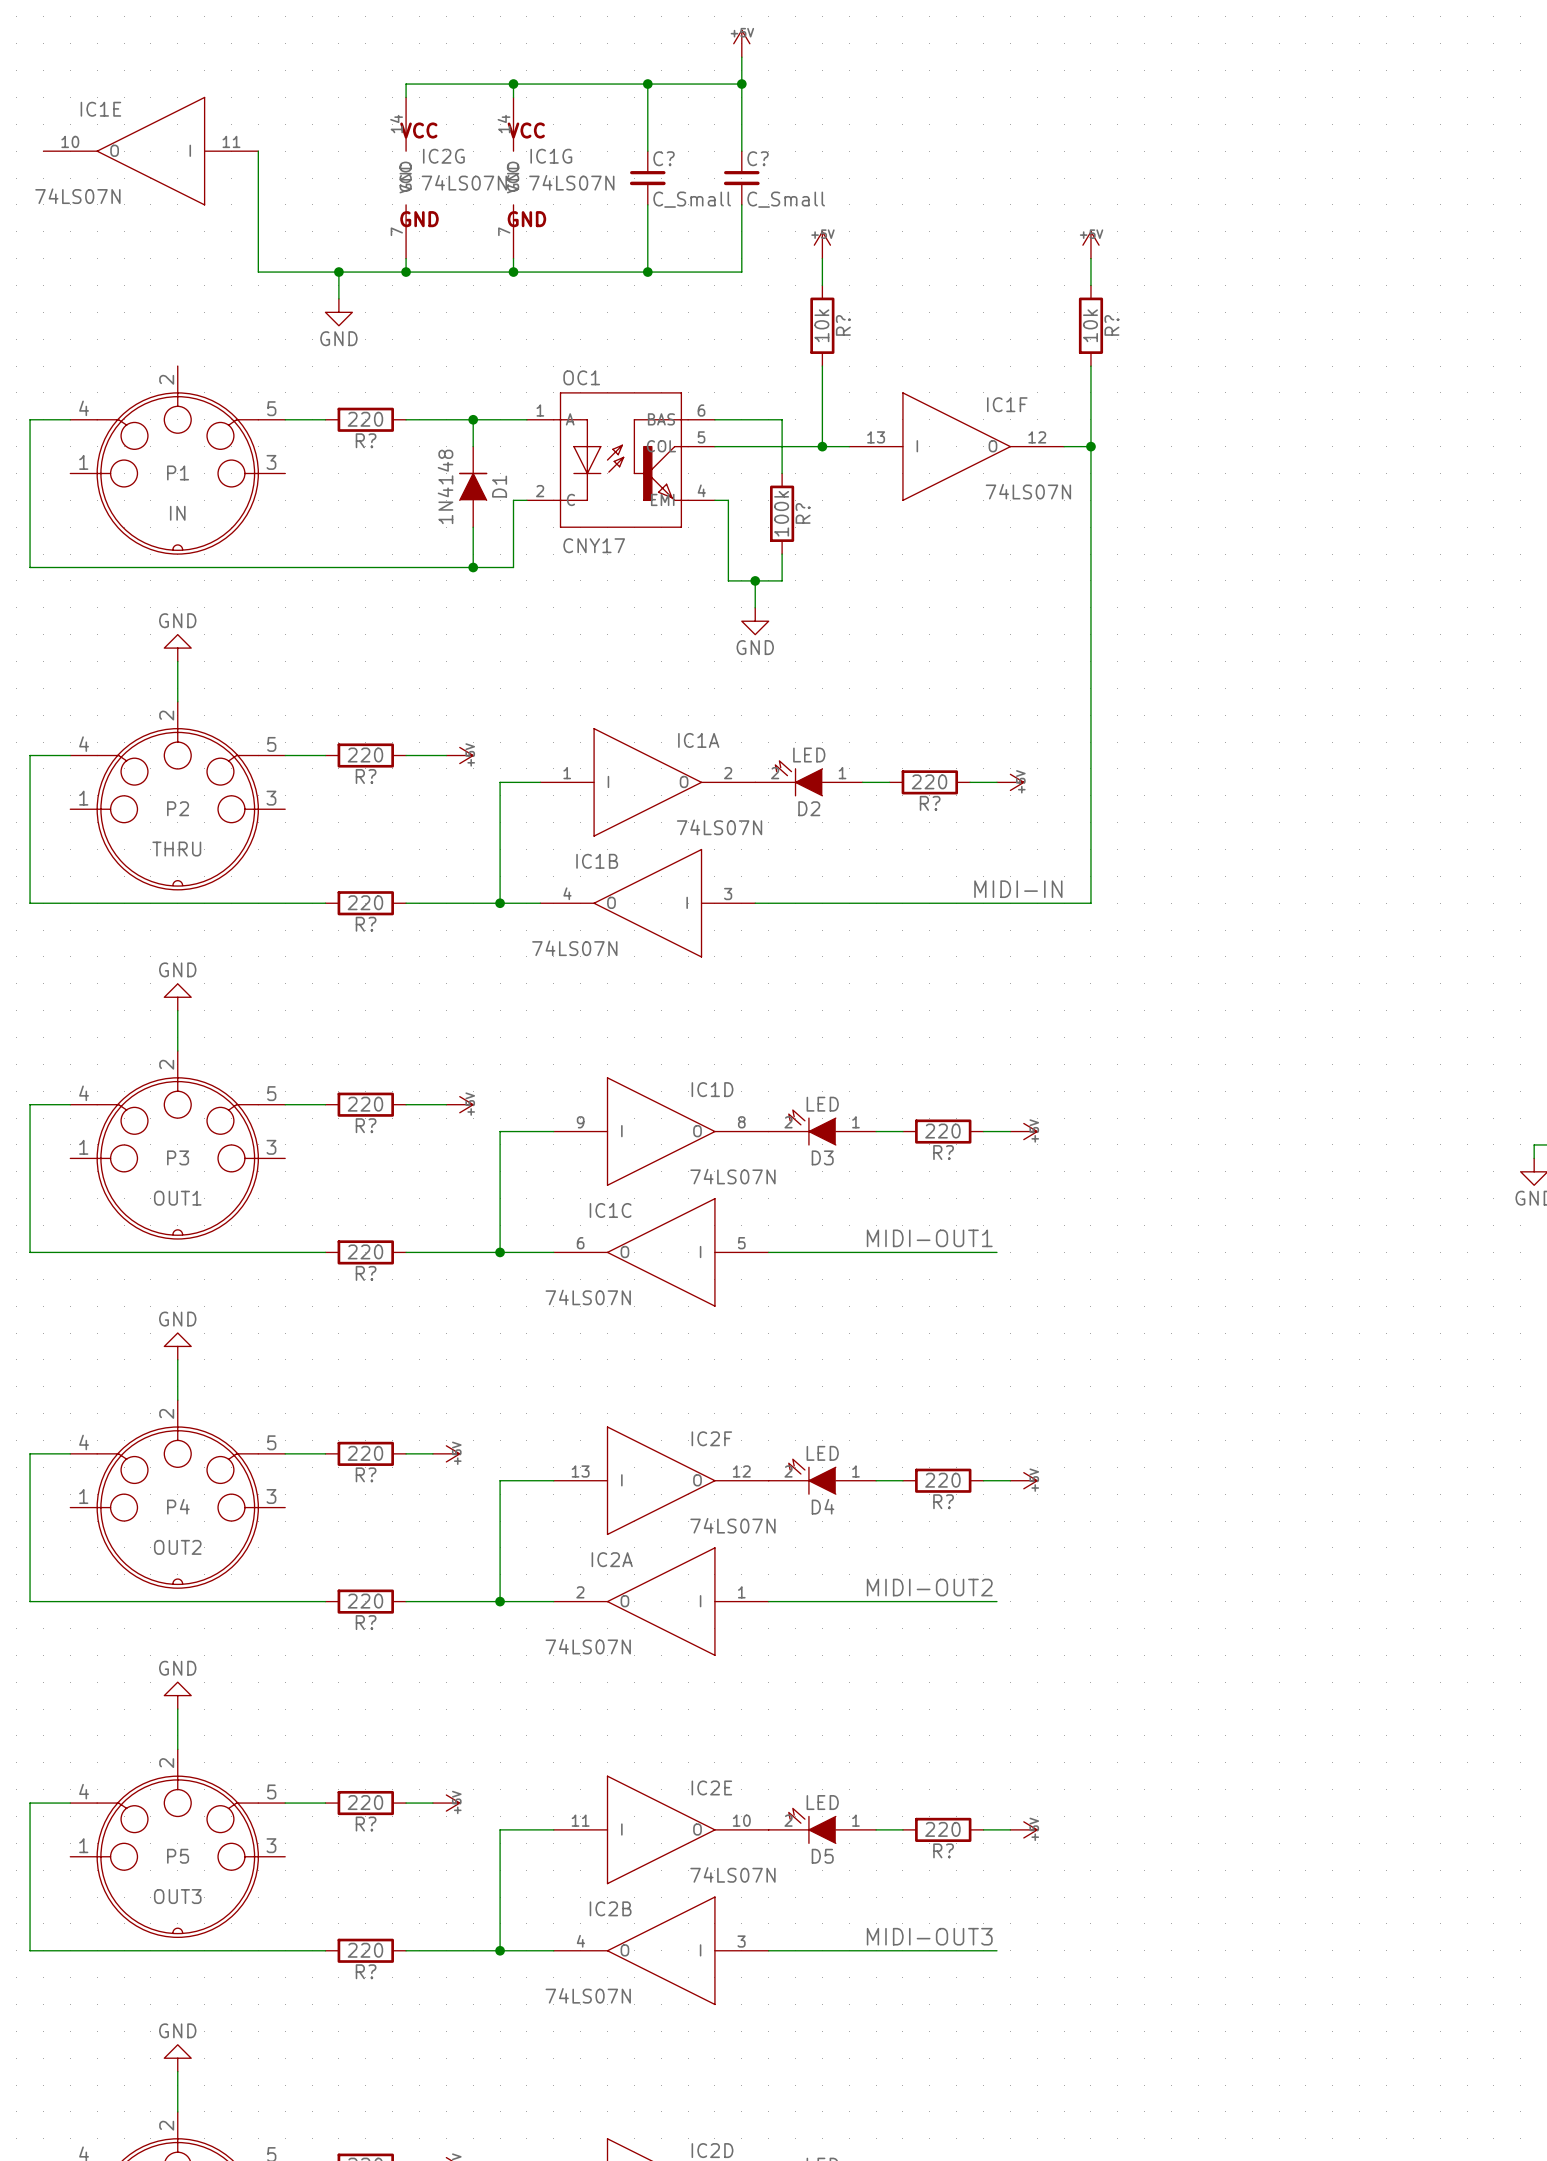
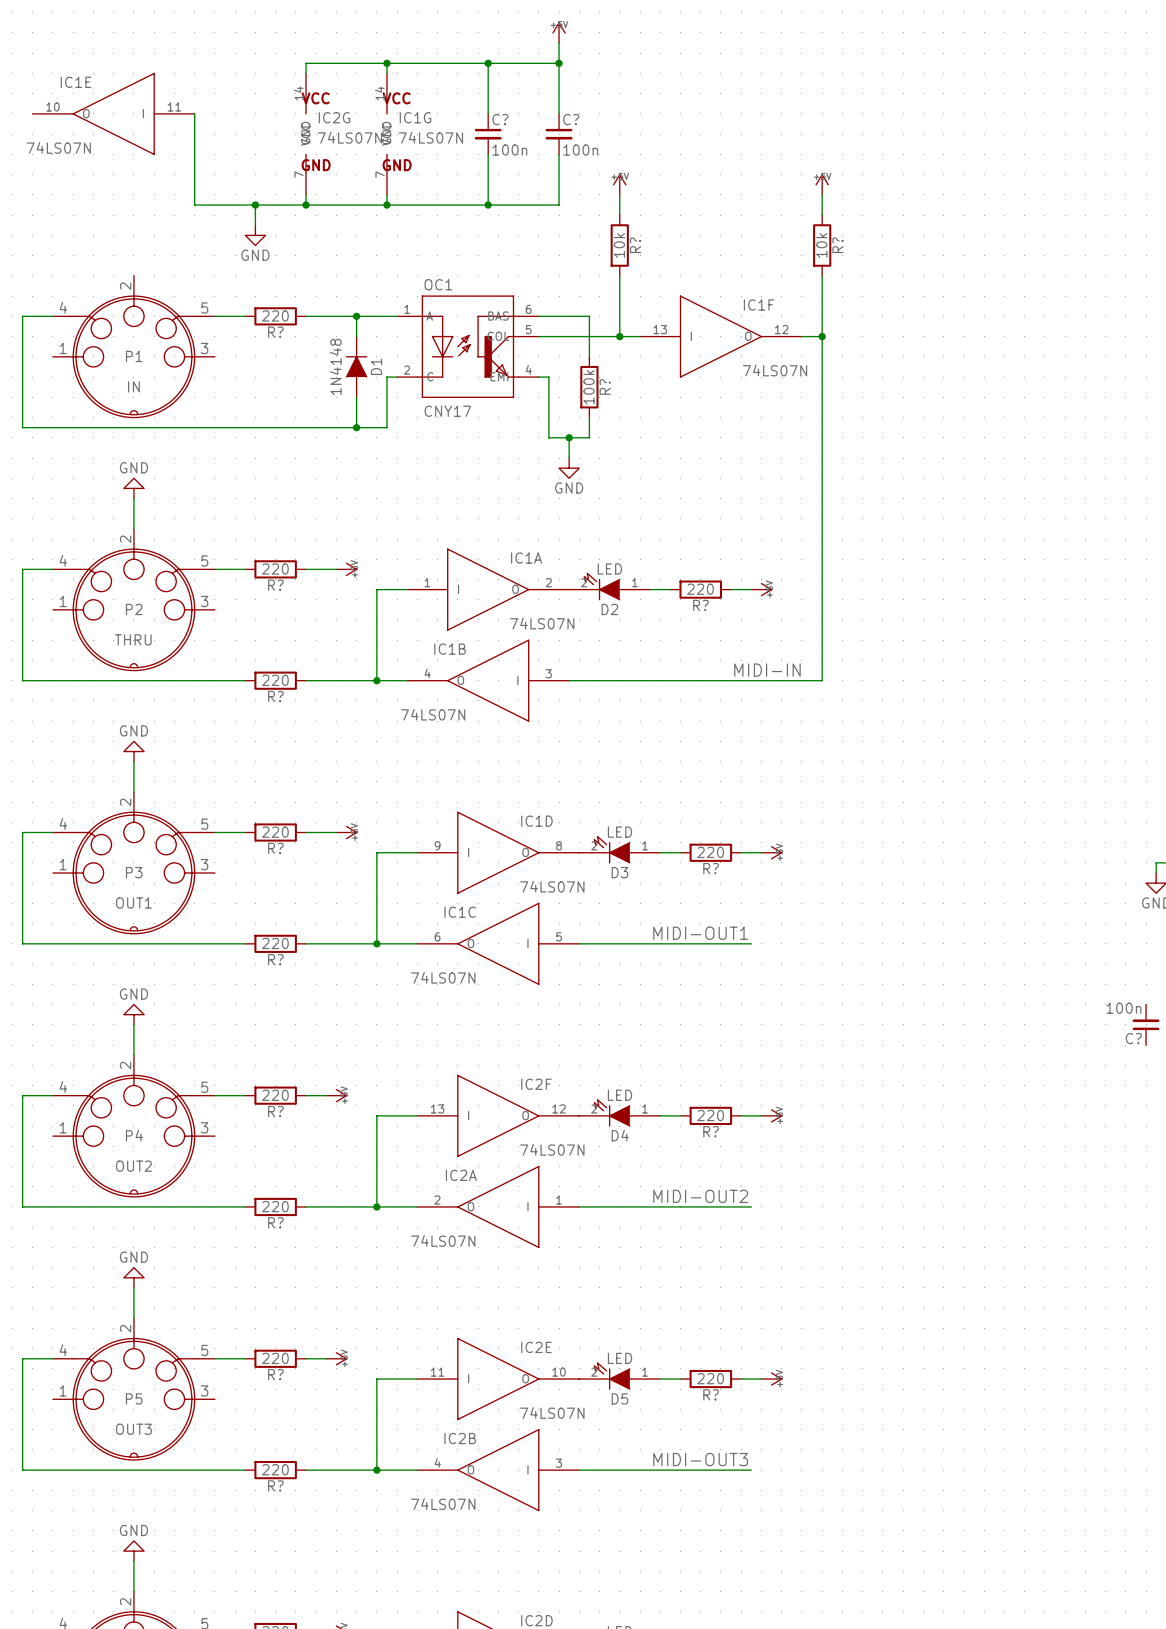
C? value: C_Small (692, 199) -> 100n (509, 149)
C? value: C_Small (786, 199) -> 100n (580, 149)
C?: none -> 100n (1146, 1024)

